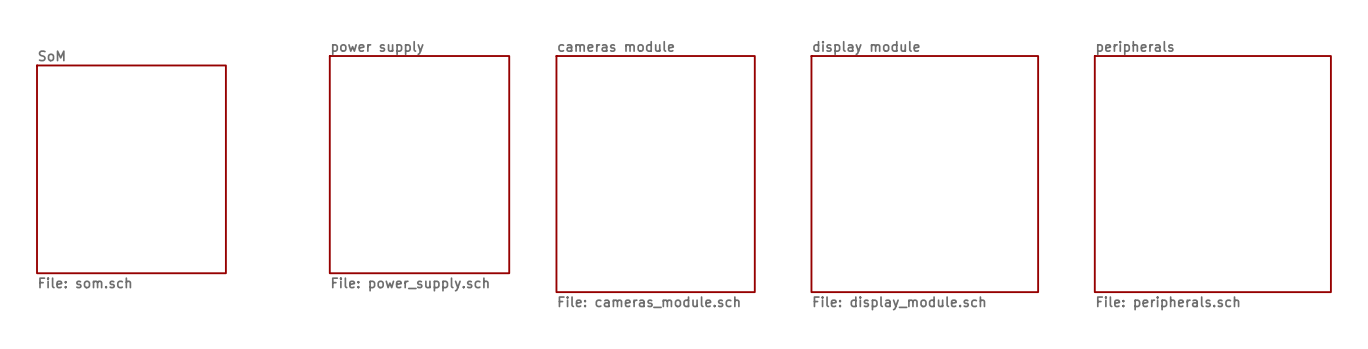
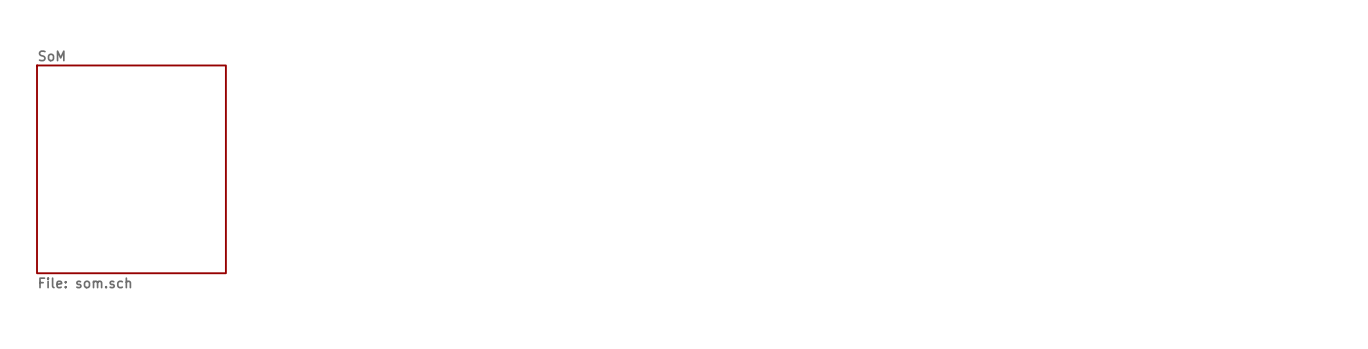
sheet power supply: File: power_supply.sch (419, 164) -> none
sheet cameras module: File: cameras_module.sch (655, 174) -> none
sheet display module: File: display_module.sch (924, 174) -> none
sheet peripherals: File: peripherals.sch (1212, 174) -> none

